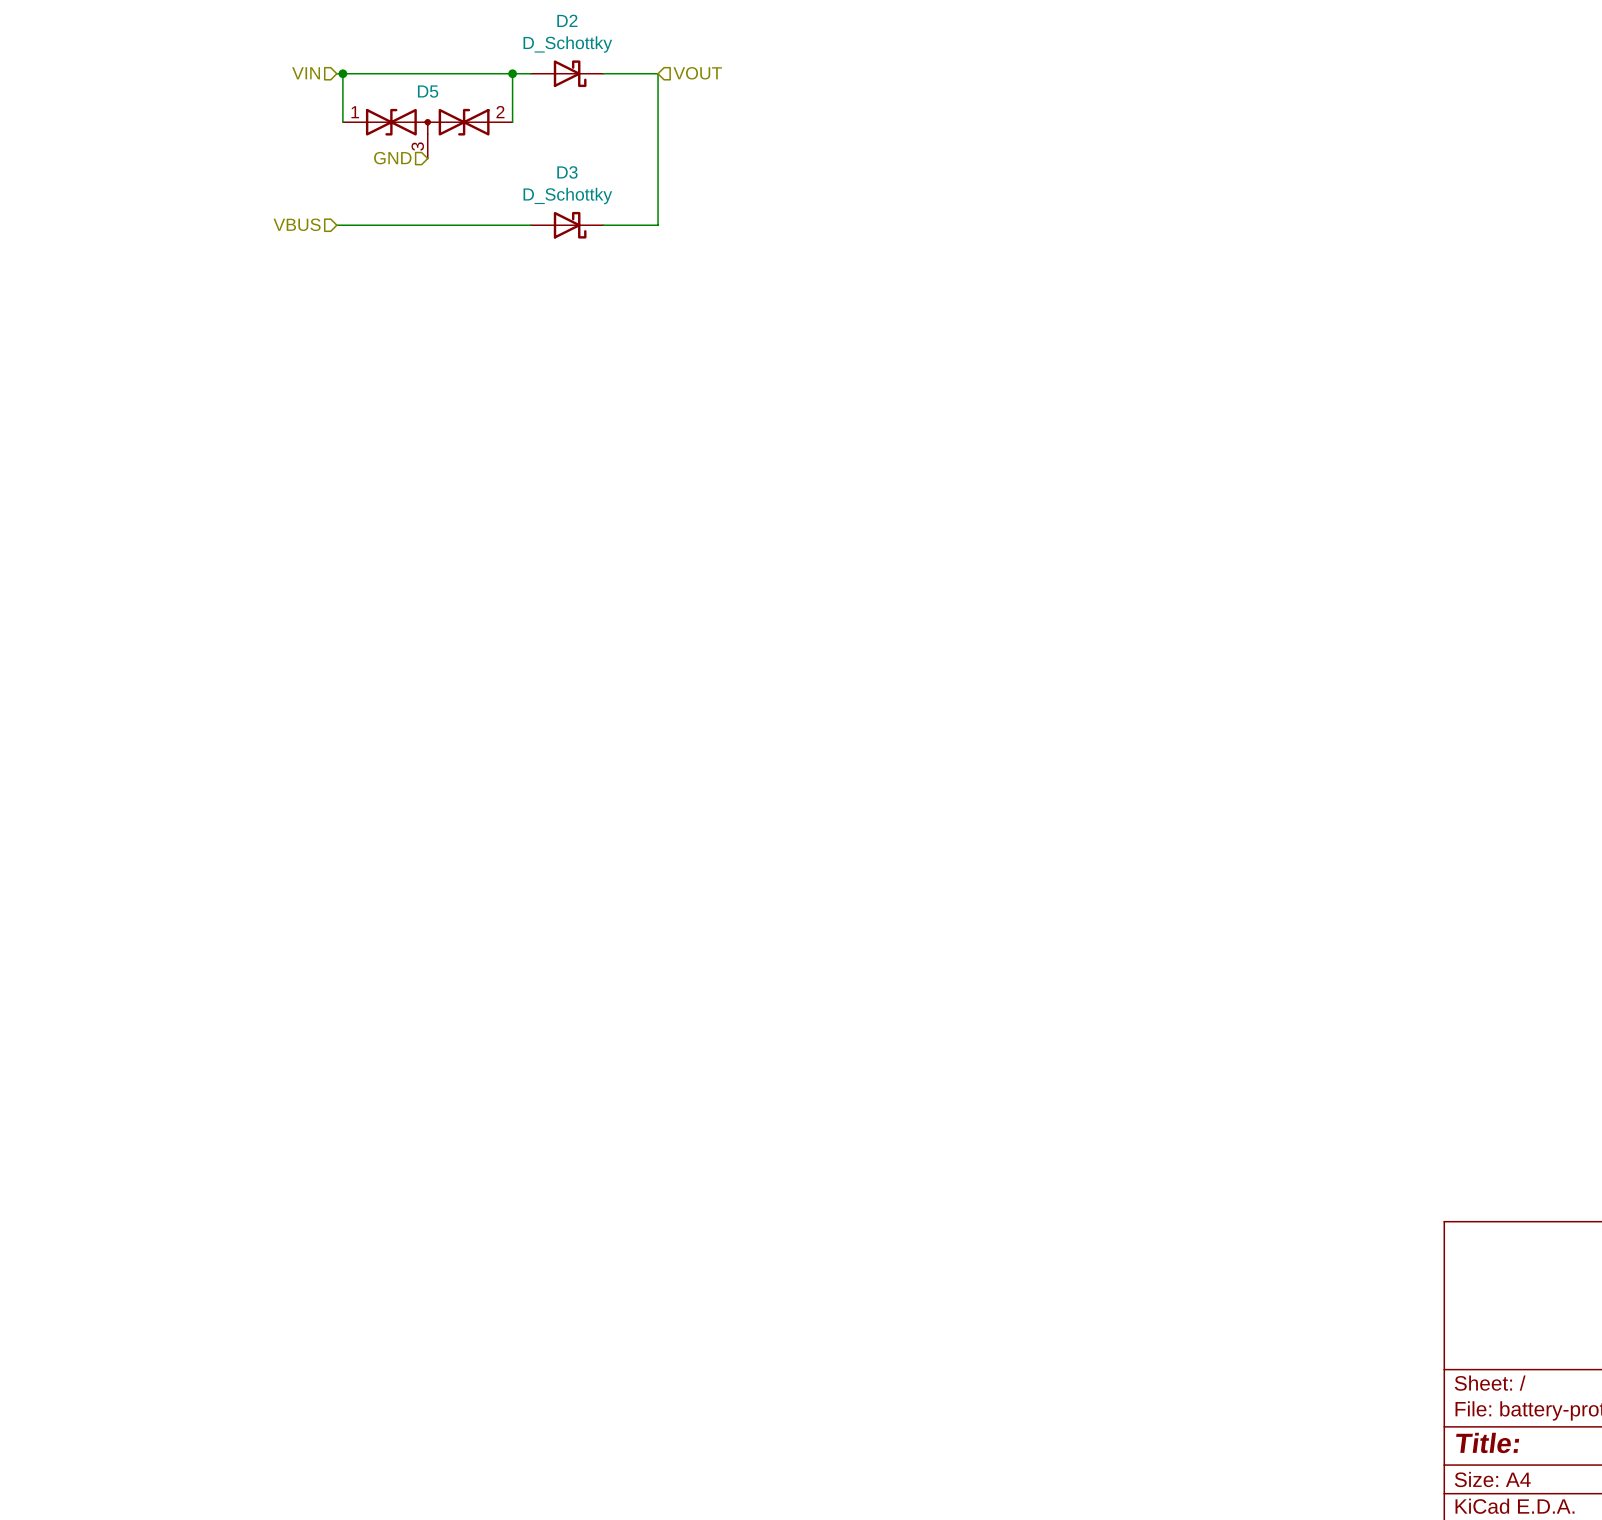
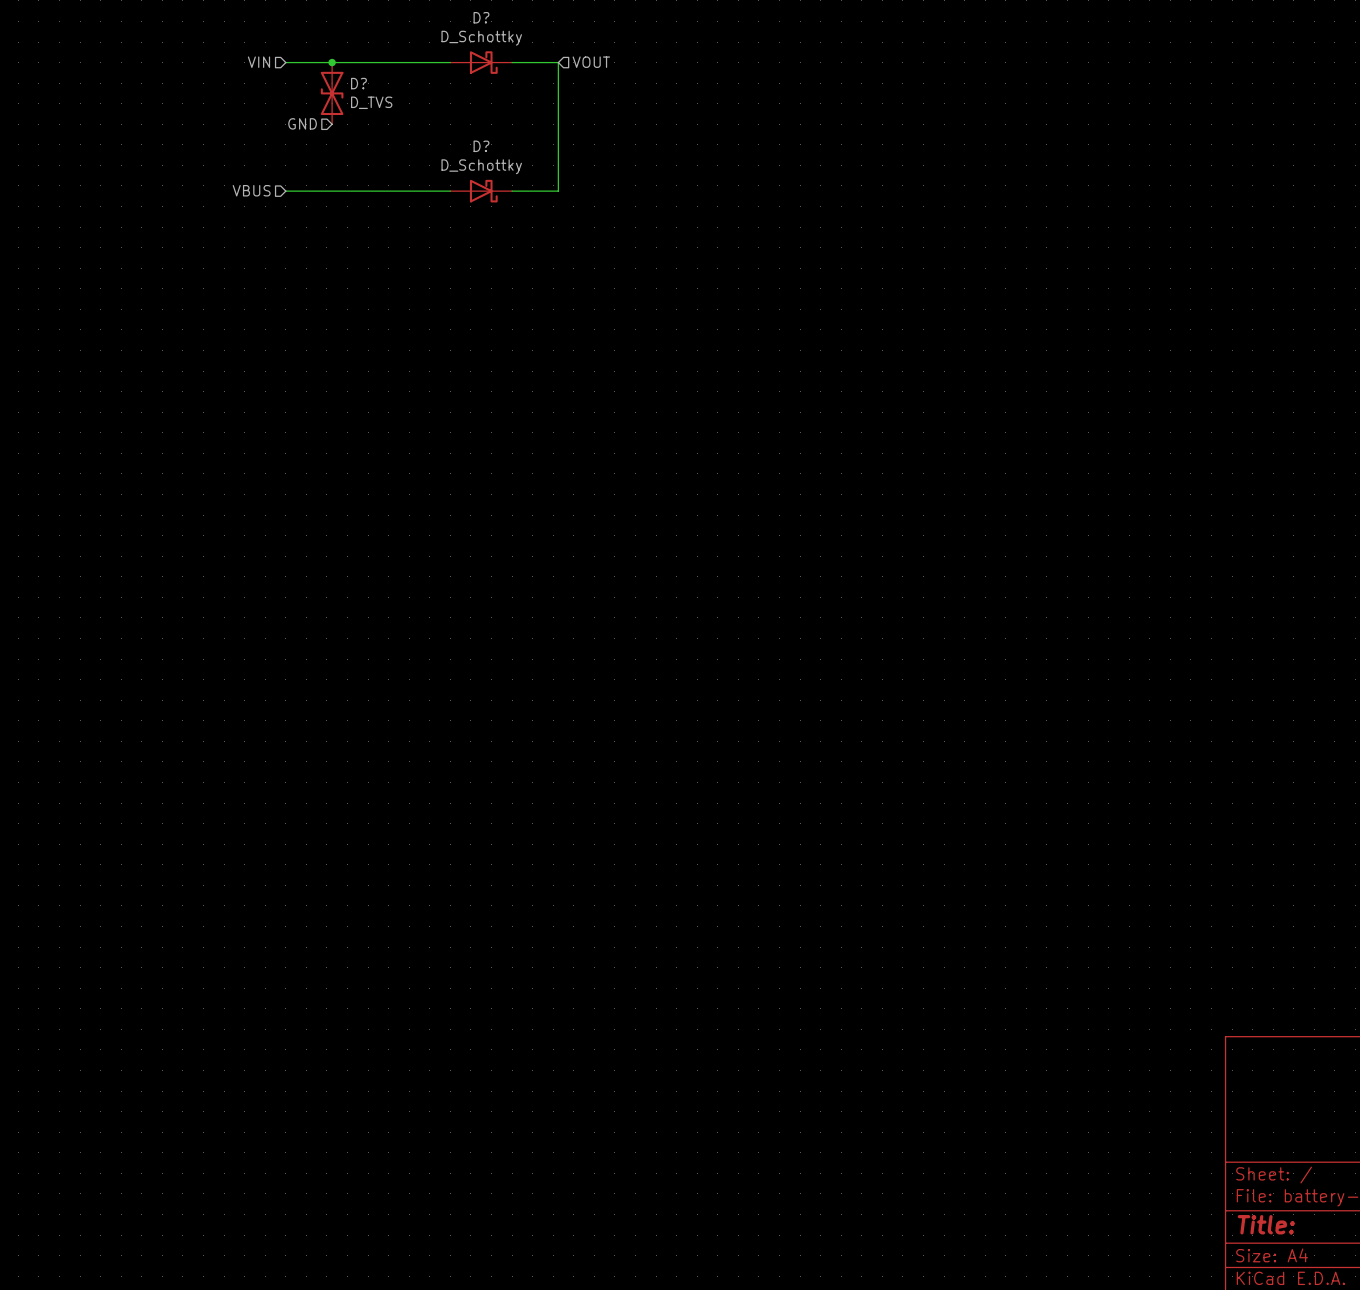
D2 name: D2 (567, 20) -> D? (481, 17)
wire: (342, 73) (342, 122) -> none
junction position: (342, 73) -> (332, 62)
wire: (512, 73) (512, 122) -> none
junction: (512, 73) -> none
D?: none -> D_TVS (332, 93)
D5: (427, 133) -> none
hierarchical label position: GND (392, 158) -> GND (302, 123)
D3 name: D3 (567, 172) -> D? (481, 146)

